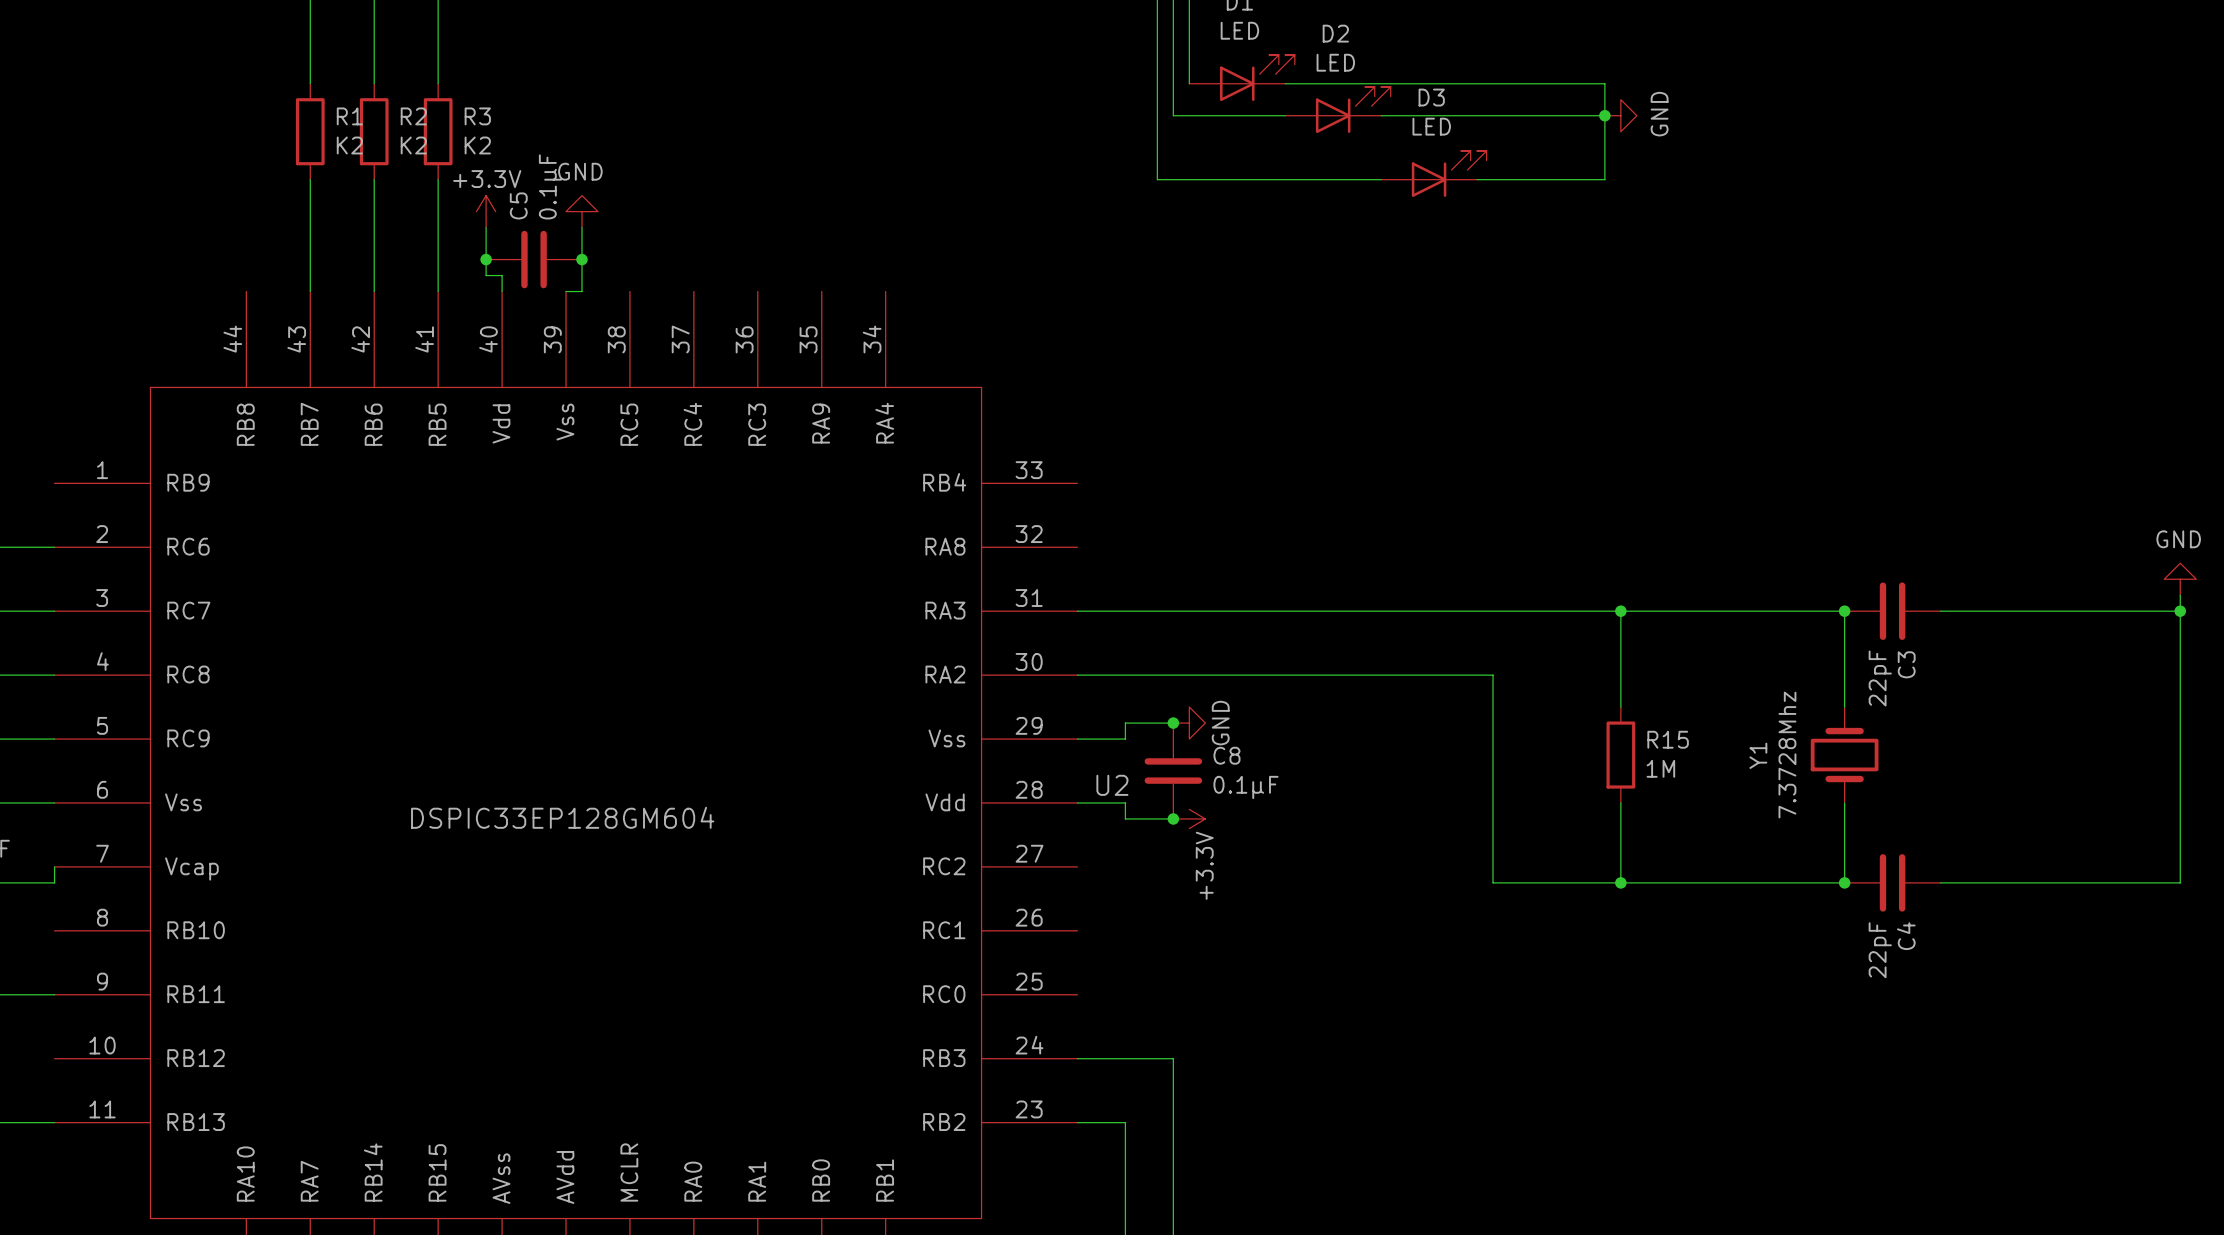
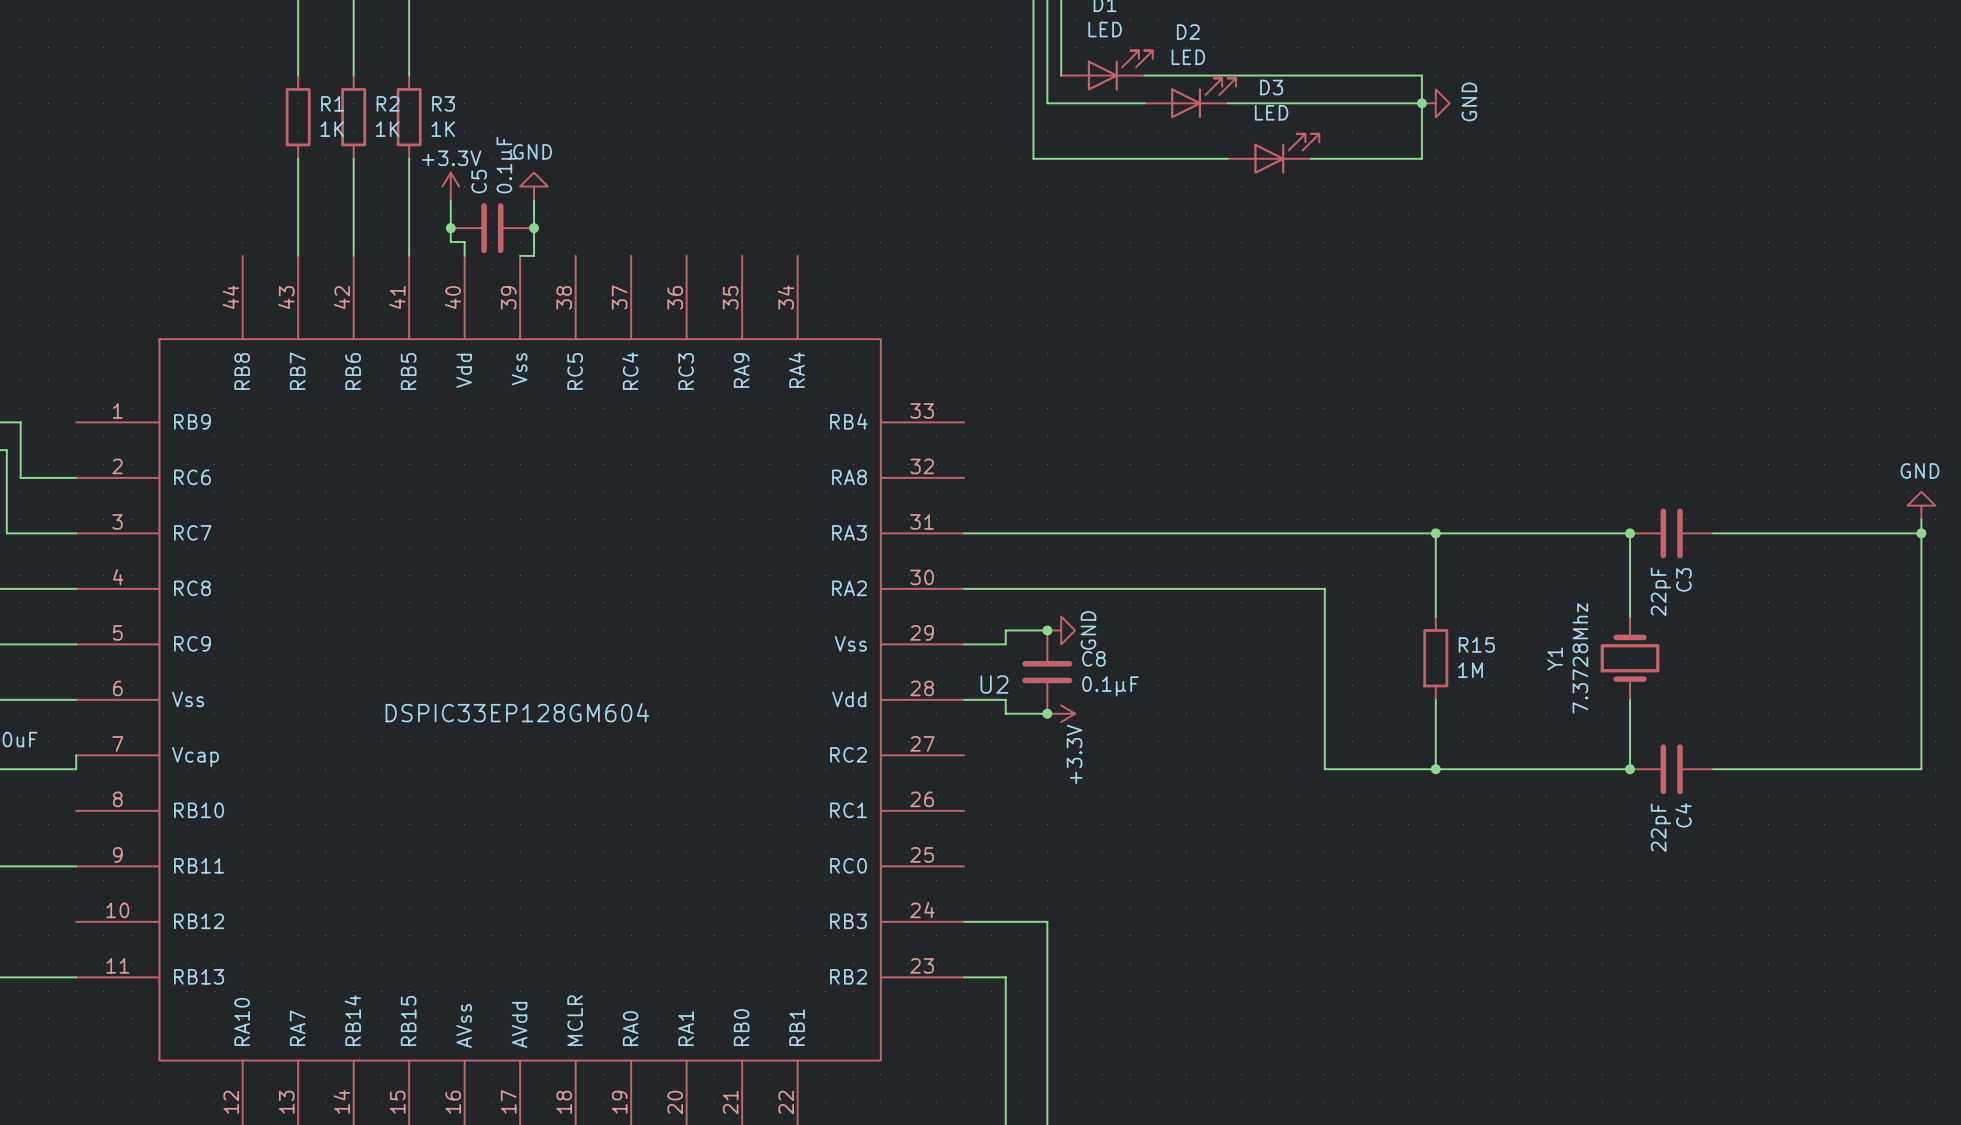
R1 value: K2 (349, 145) -> 1K (332, 129)
R2 value: K2 (413, 145) -> 1K (387, 129)
R3 value: K2 (477, 145) -> 1K (443, 129)

